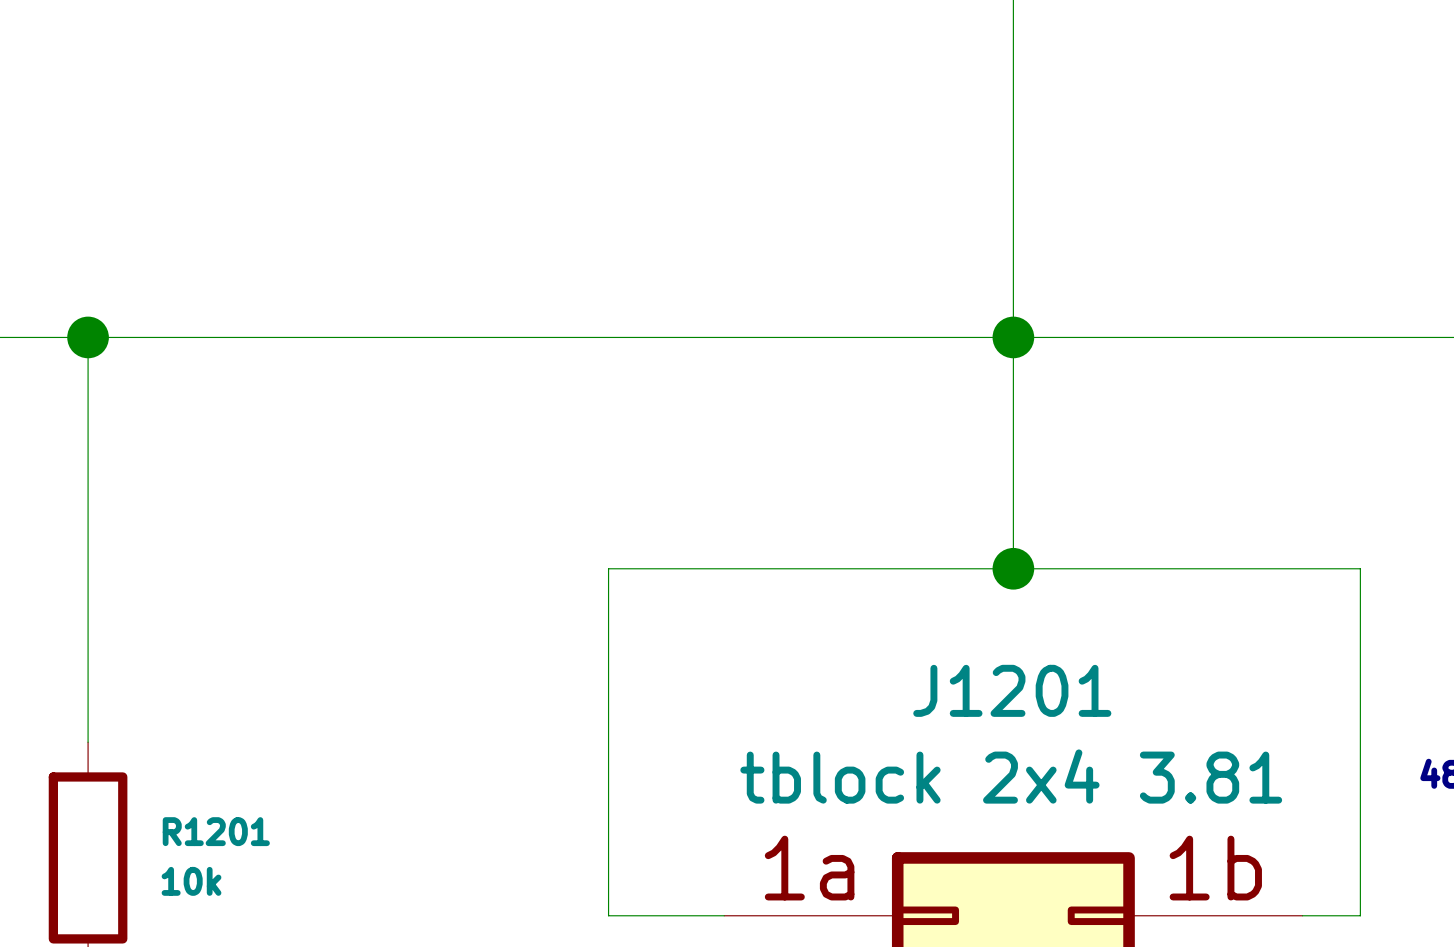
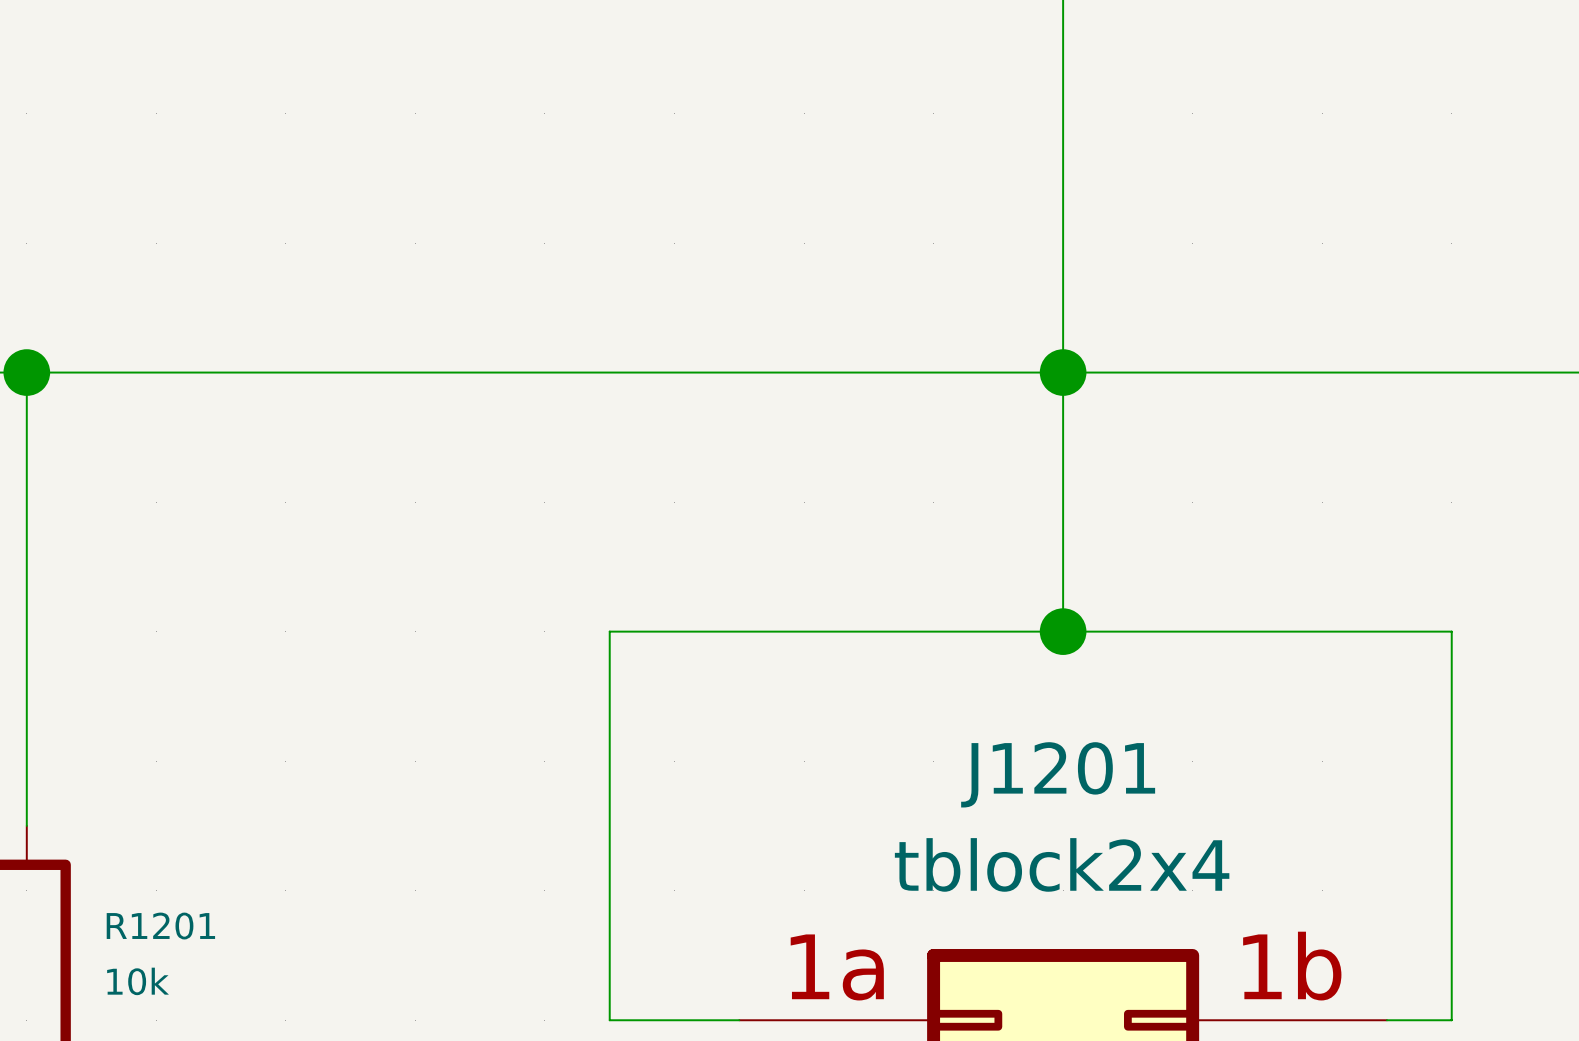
J1201 value: tblock 2x4 3.81 (1011, 776) -> tblock2x4 (1062, 864)

